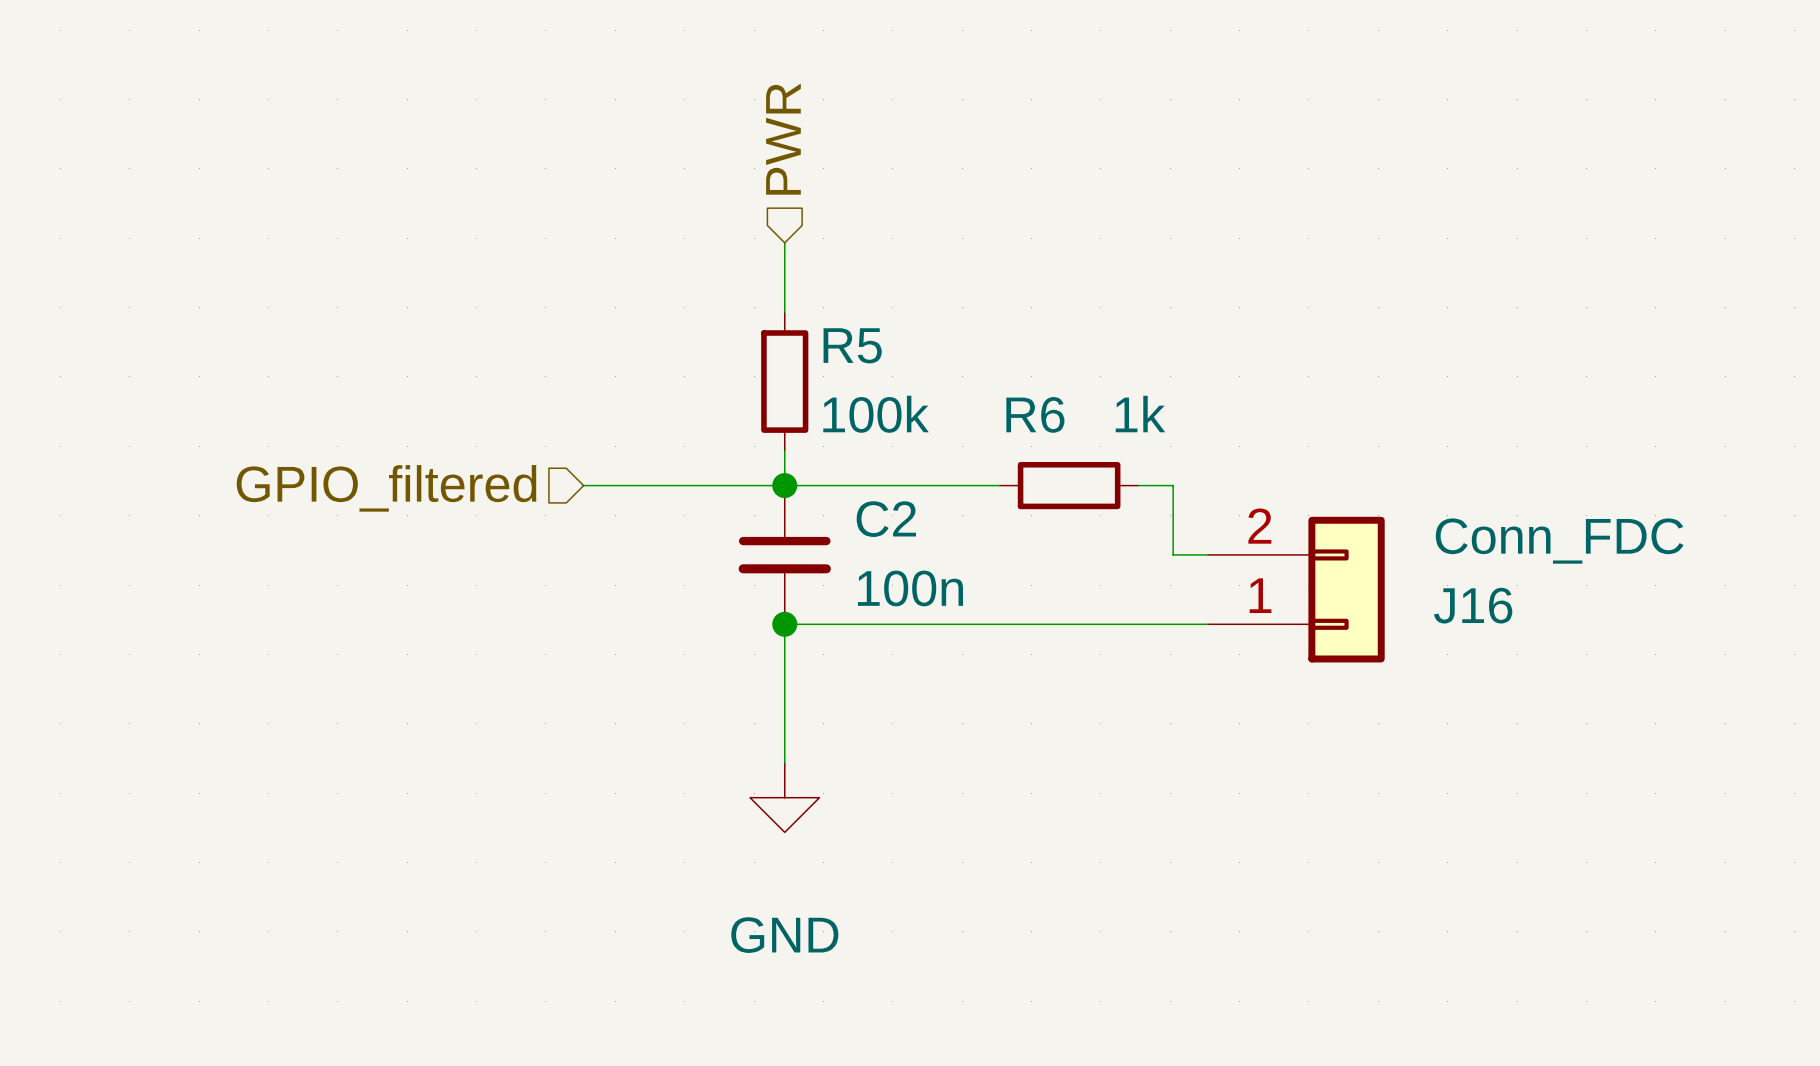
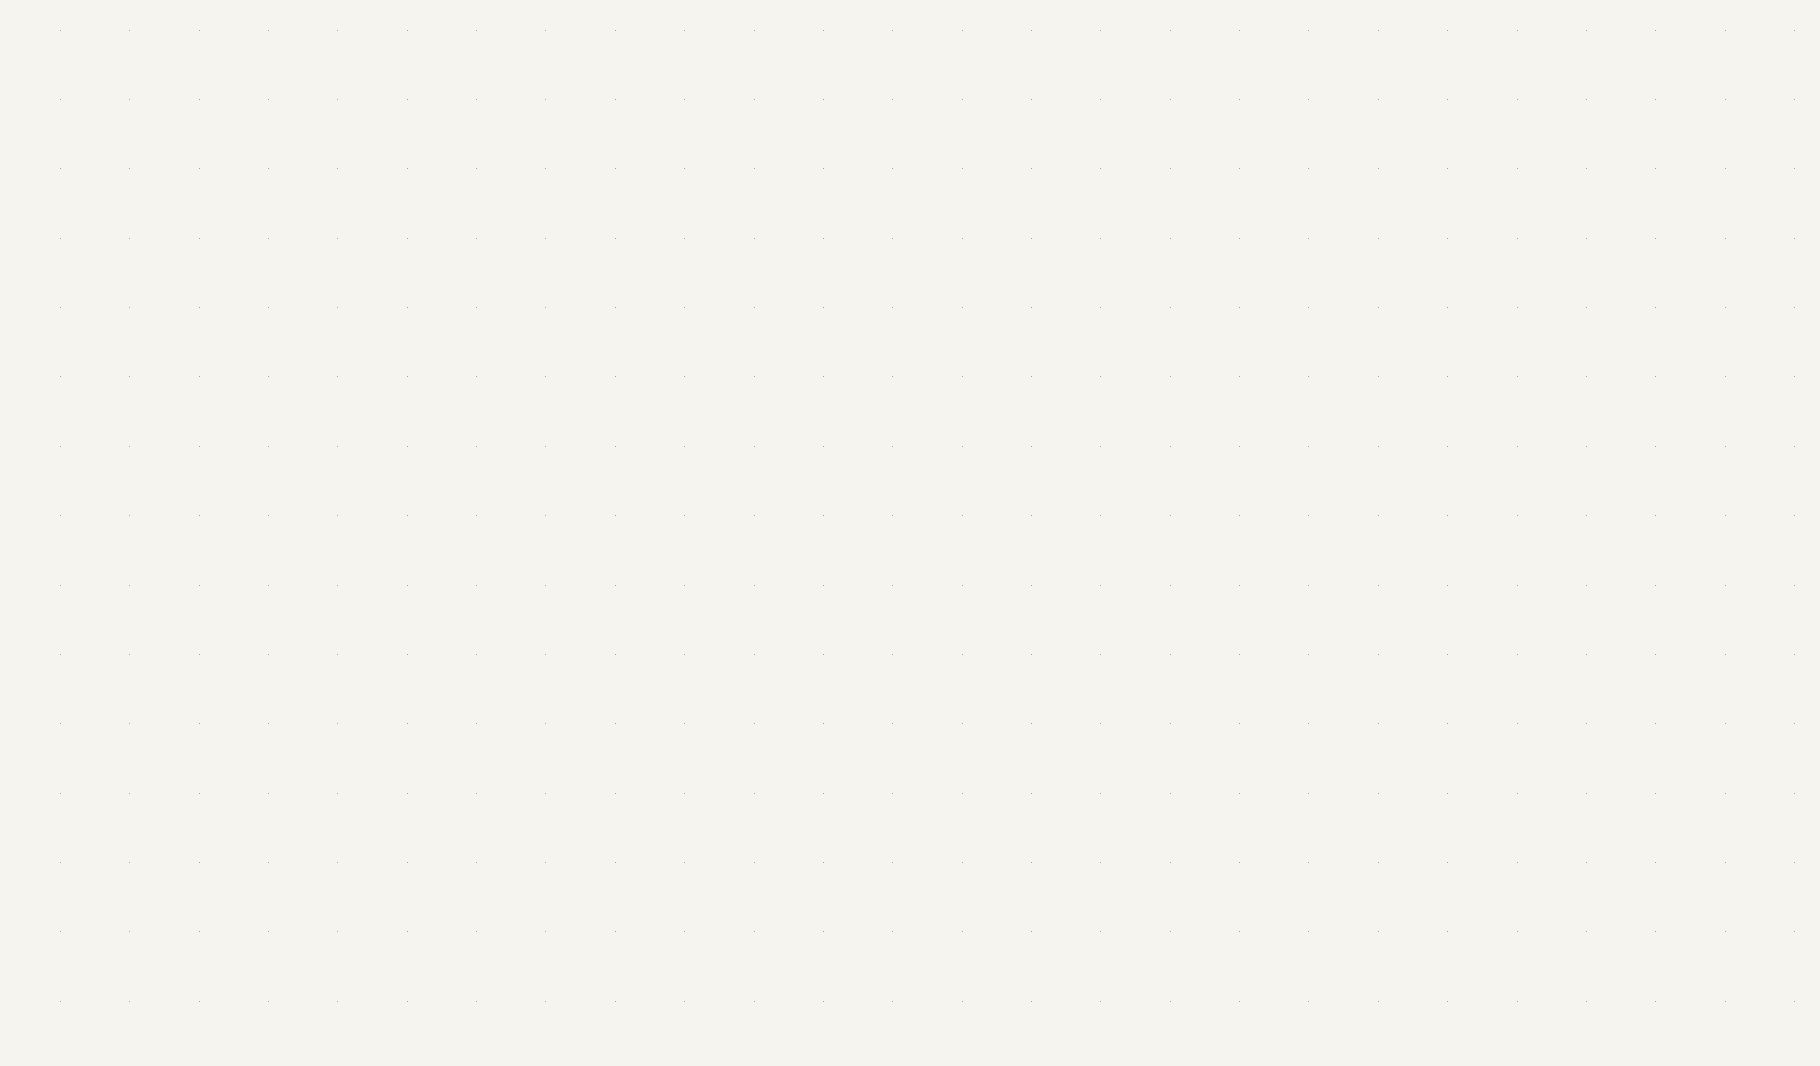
hierarchical label: PWR (783, 139) -> none
wire: (784, 242) (784, 312) -> none
R5: 100k (784, 381) -> none
wire: (784, 450) (784, 485) -> none
wire: (583, 485) (999, 485) -> none
junction: (784, 485) -> none
R6: 1k (1069, 485) -> none
wire: (1138, 485) (1173, 485) (1173, 554) (1207, 554) -> none
hierarchical label: GPIO_filtered (386, 488) -> none
C2: 100n (784, 554) -> none
J16: Conn_FDC (1296, 589) -> none
junction: (784, 624) -> none
wire: (1207, 624) (784, 624) (784, 763) -> none
power symbol: GND (784, 797) -> none

